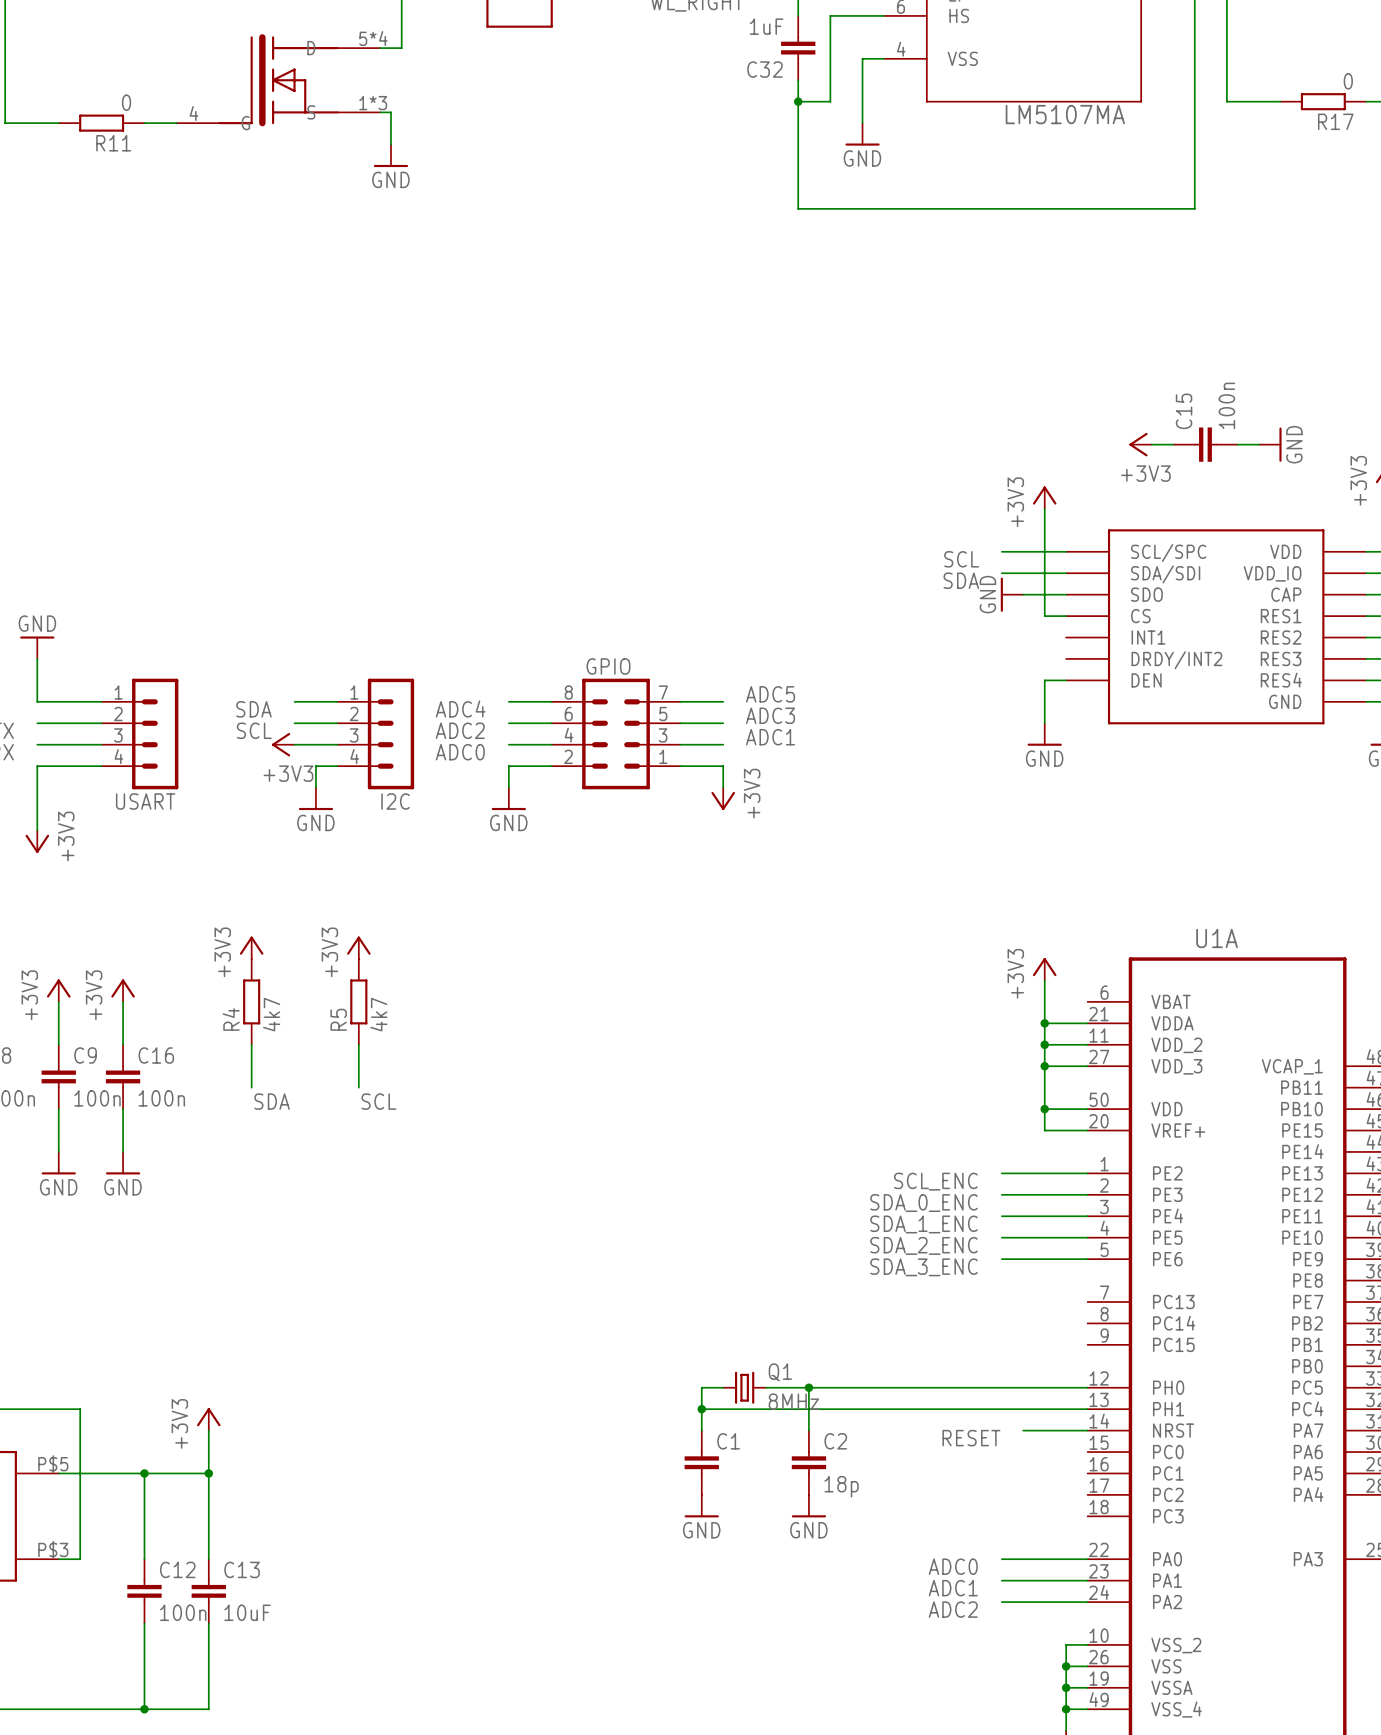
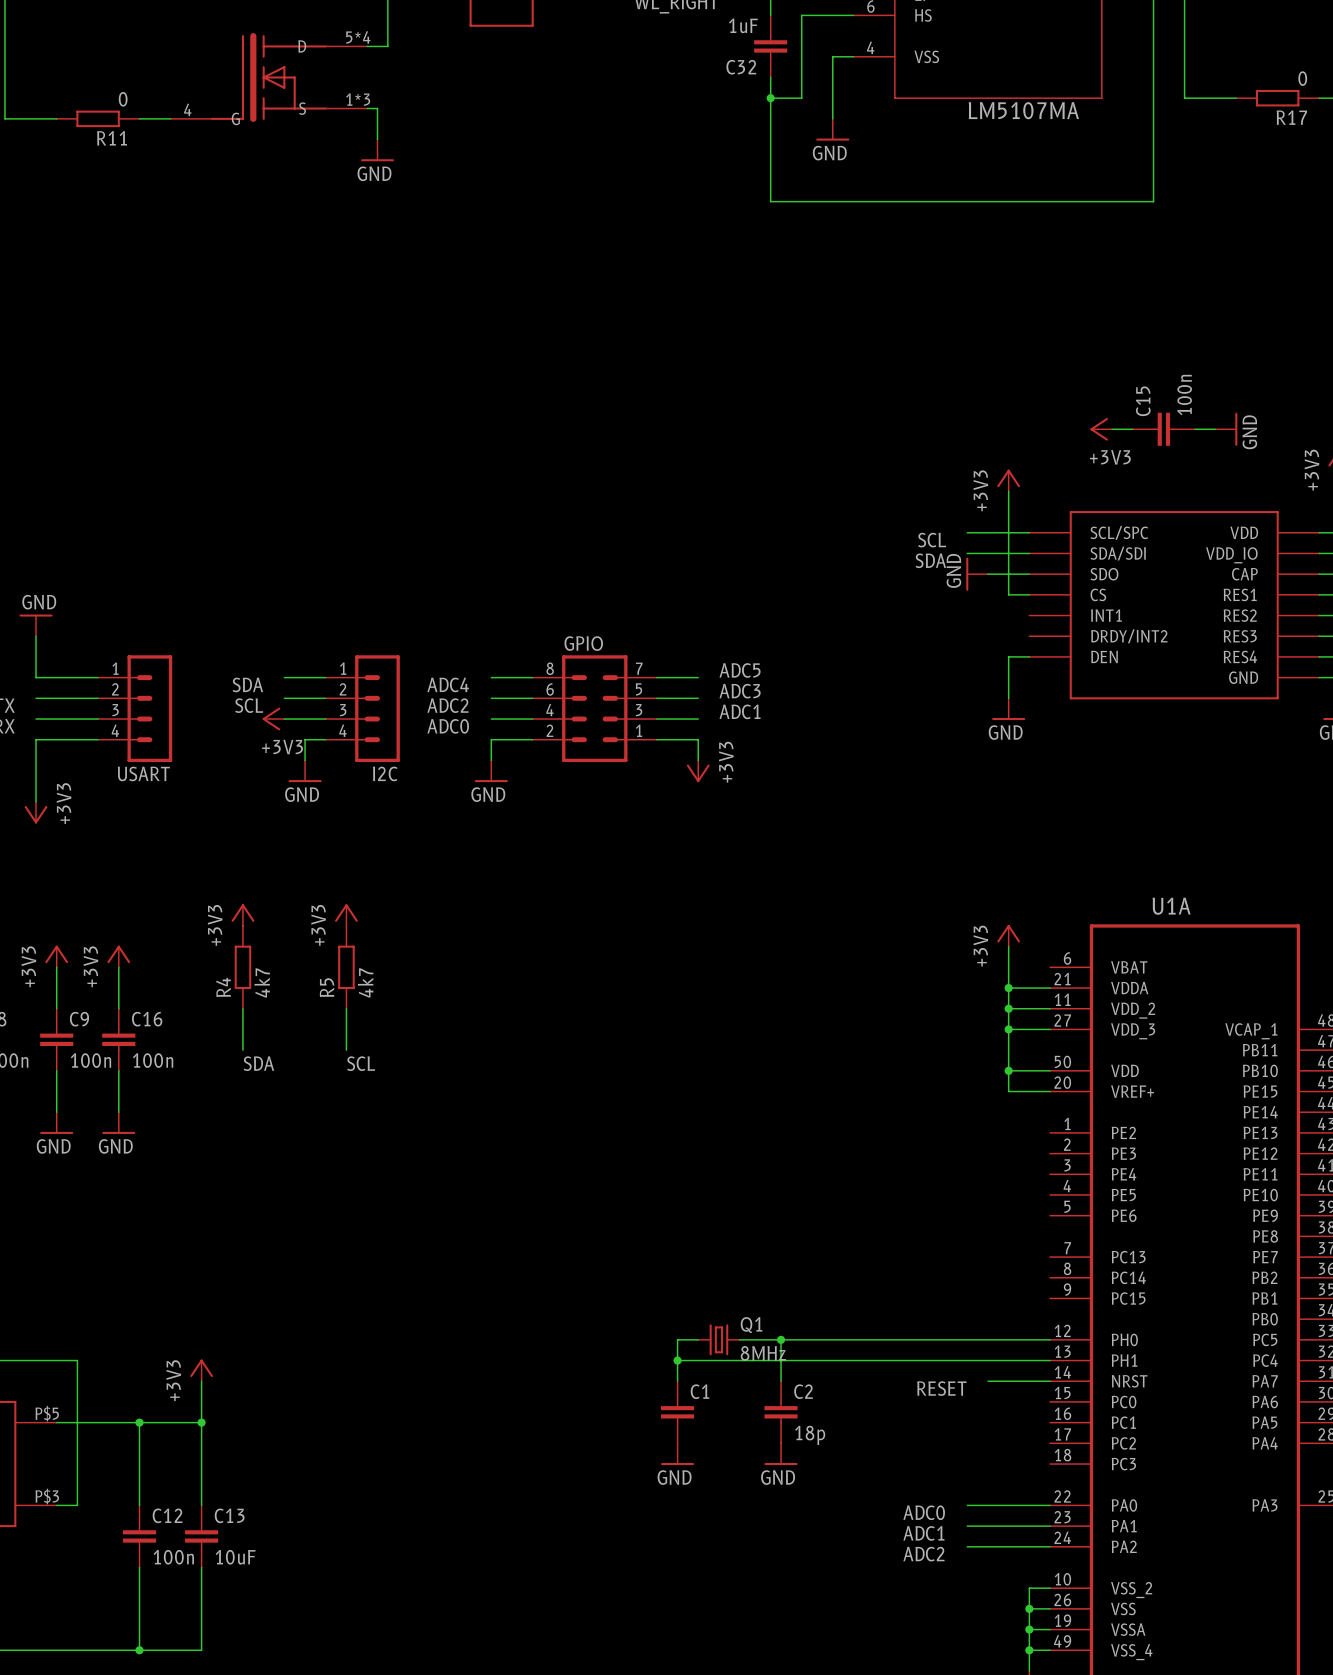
wire: (1001, 1173) (1087, 1173) -> none
label: SCL_ENC (935, 1181) -> none
wire: (1001, 1194) (1087, 1194) -> none
label: SDA_0_ENC (924, 1203) -> none
wire: (1001, 1216) (1087, 1216) -> none
label: SDA_1_ENC (924, 1224) -> none
wire: (1001, 1237) (1087, 1237) -> none
label: SDA_2_ENC (924, 1245) -> none
wire: (1001, 1259) (1087, 1259) -> none
label: SDA_3_ENC (924, 1267) -> none

